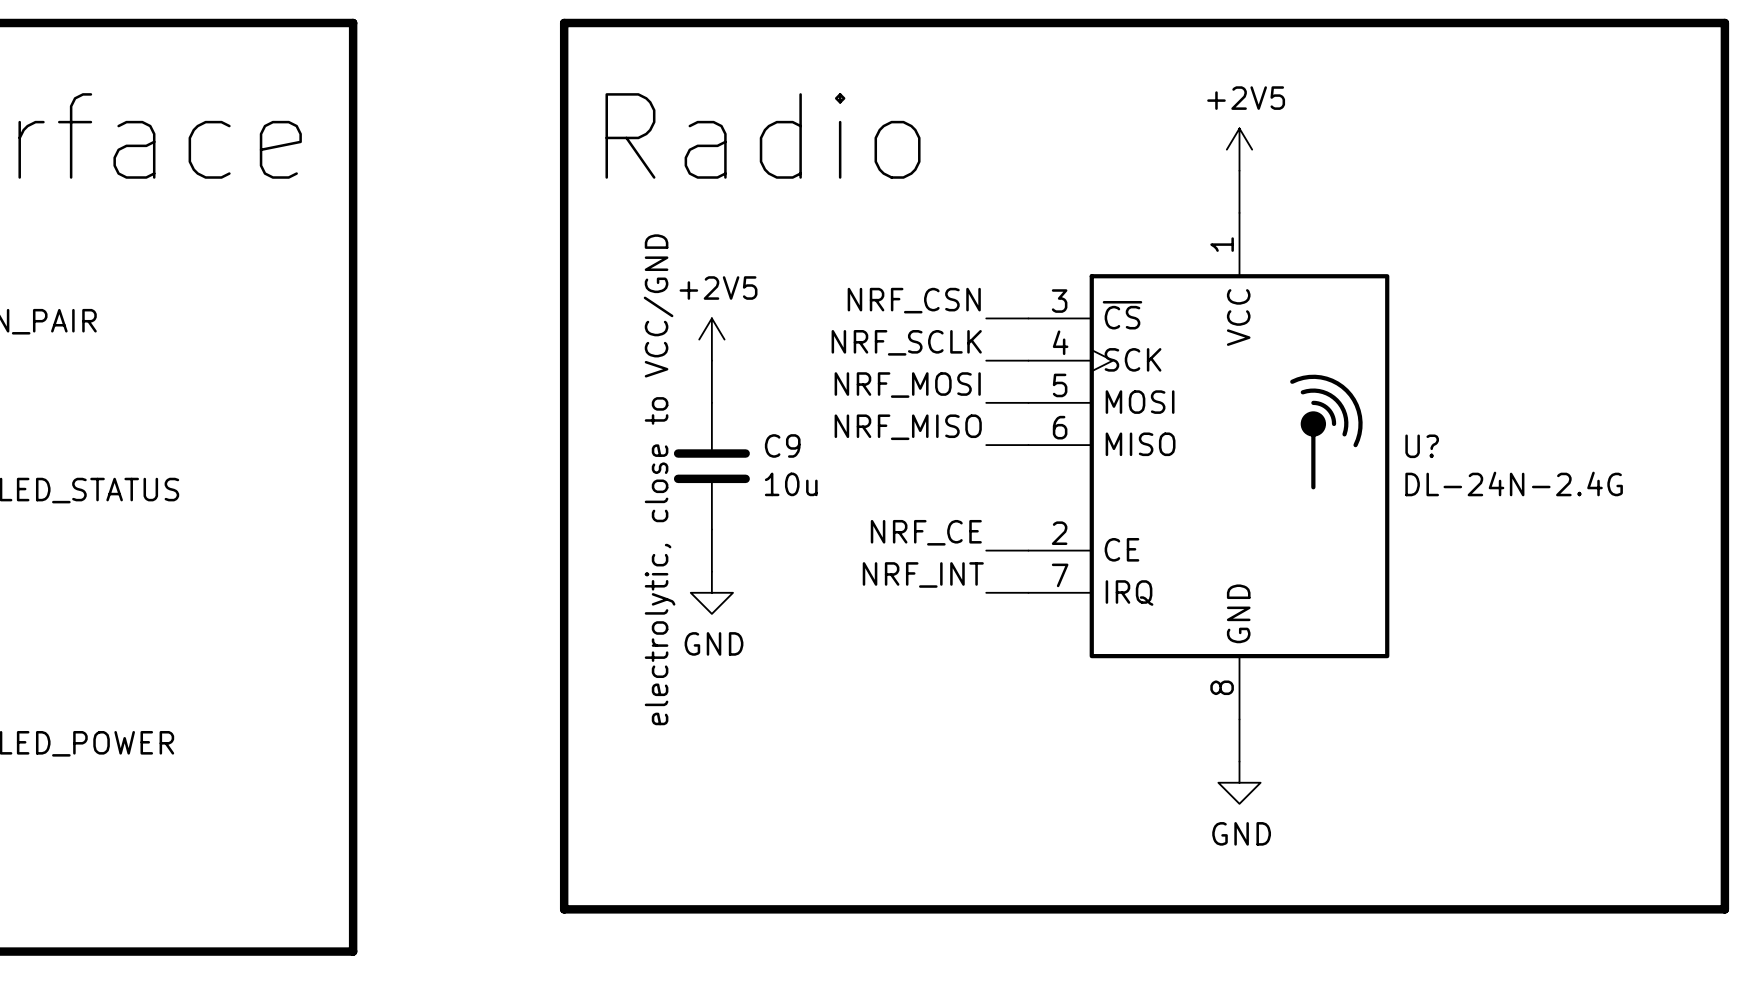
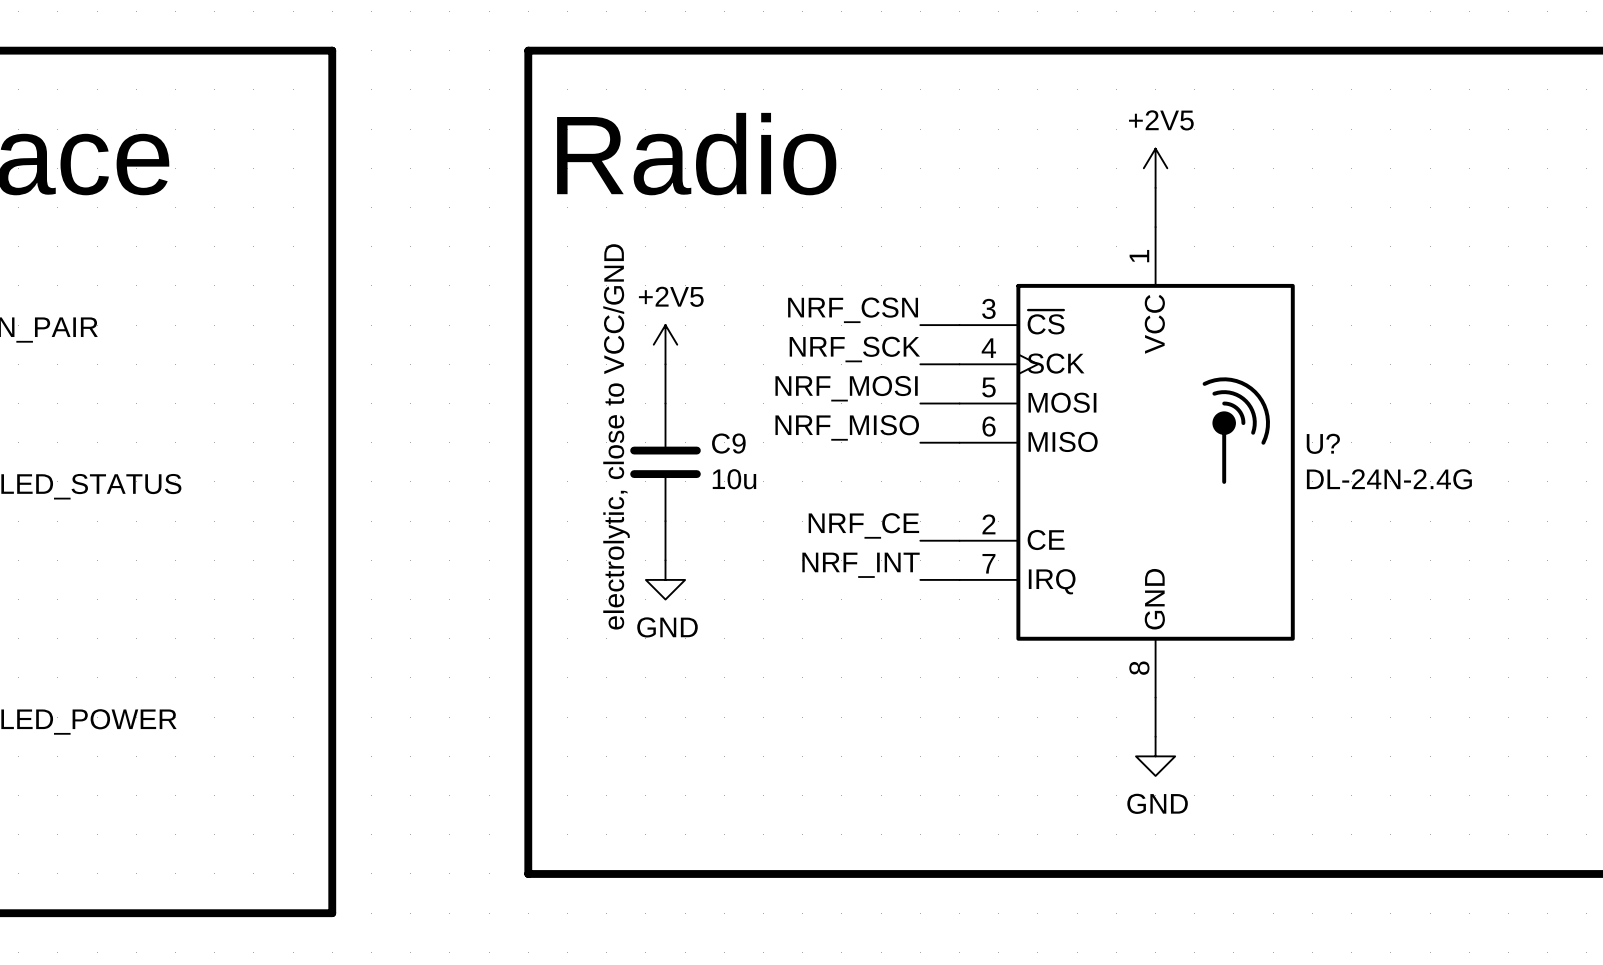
label: NRF_SCLK (906, 342) -> NRF_SCK (854, 349)

